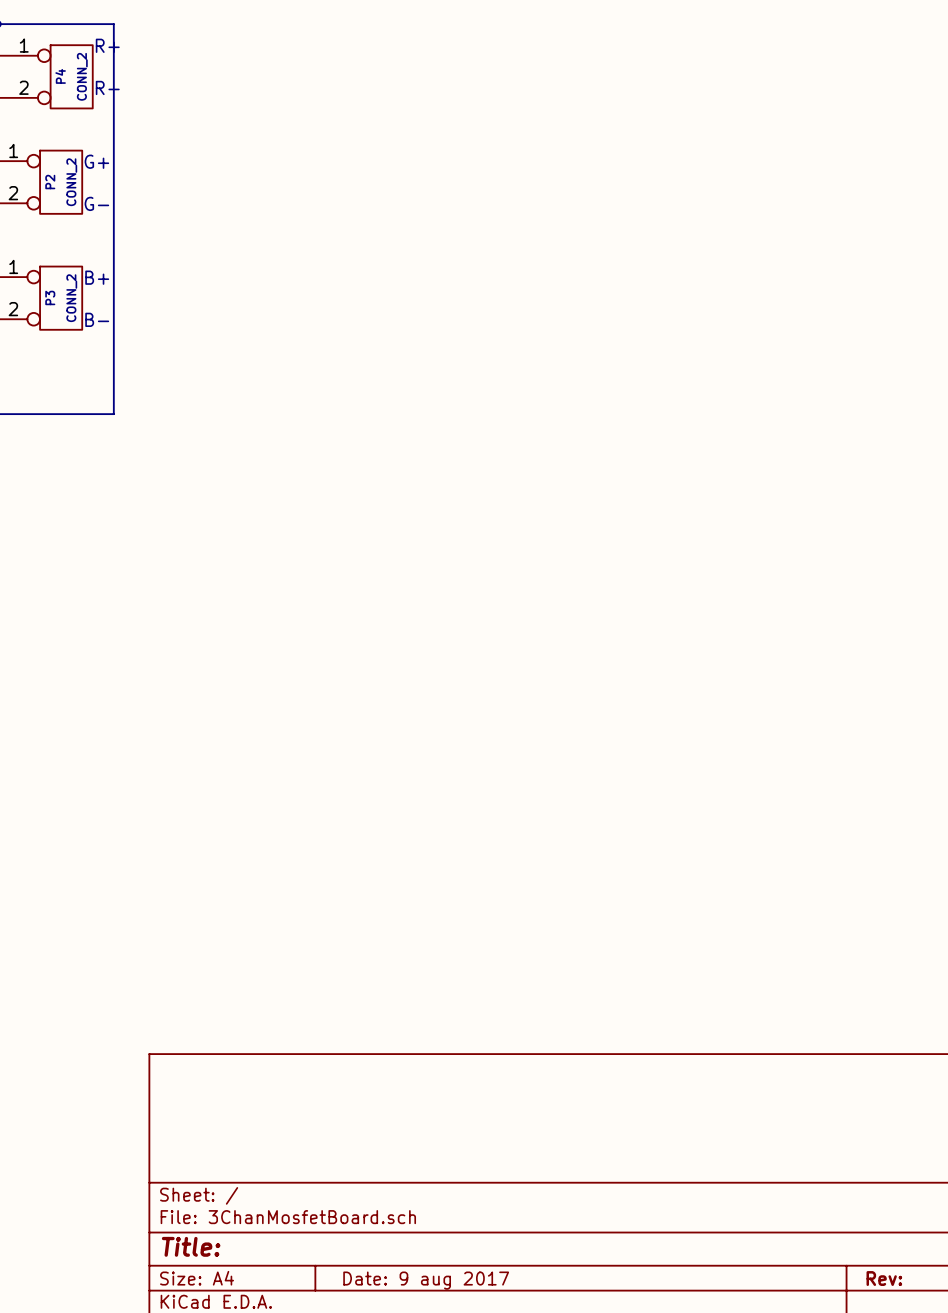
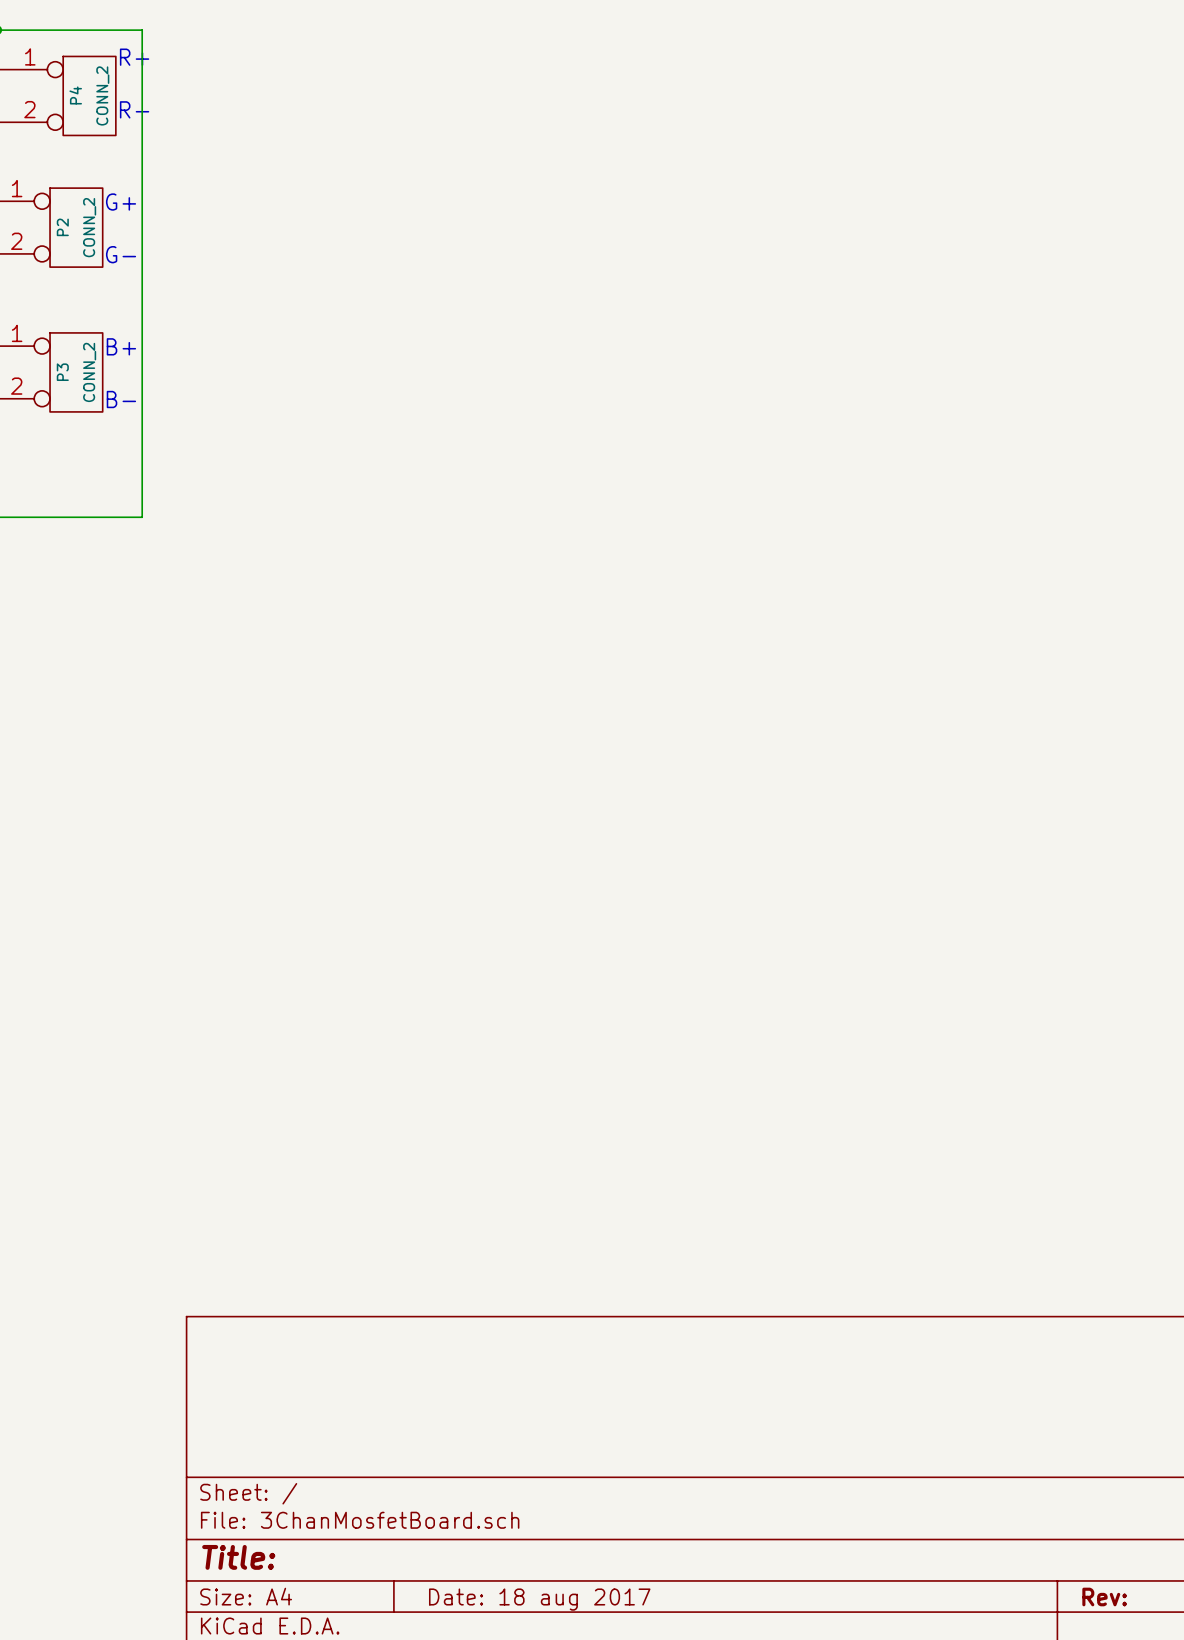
title block: Date: 9 aug 2017 (426, 1280) -> Date: 18 aug 2017 (539, 1599)

